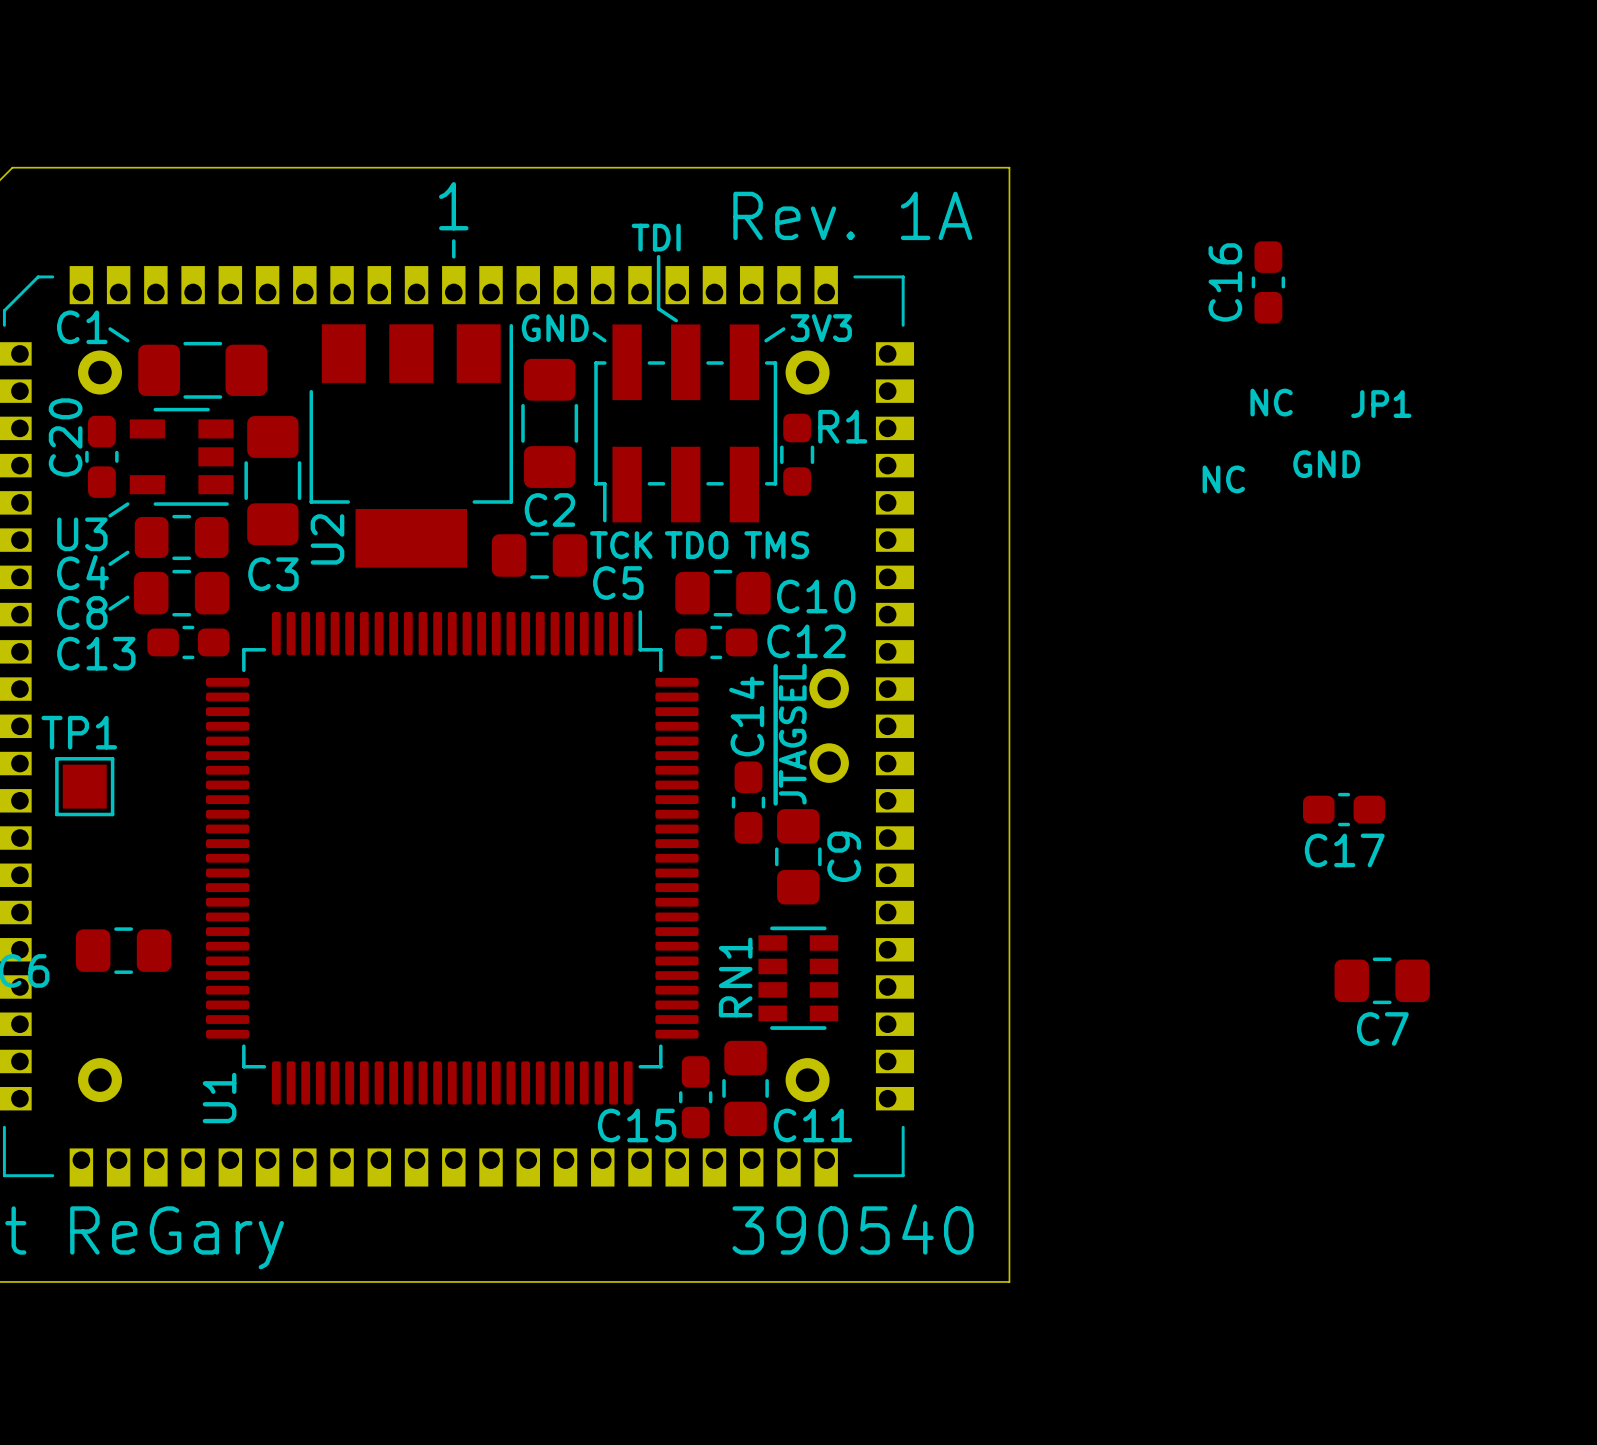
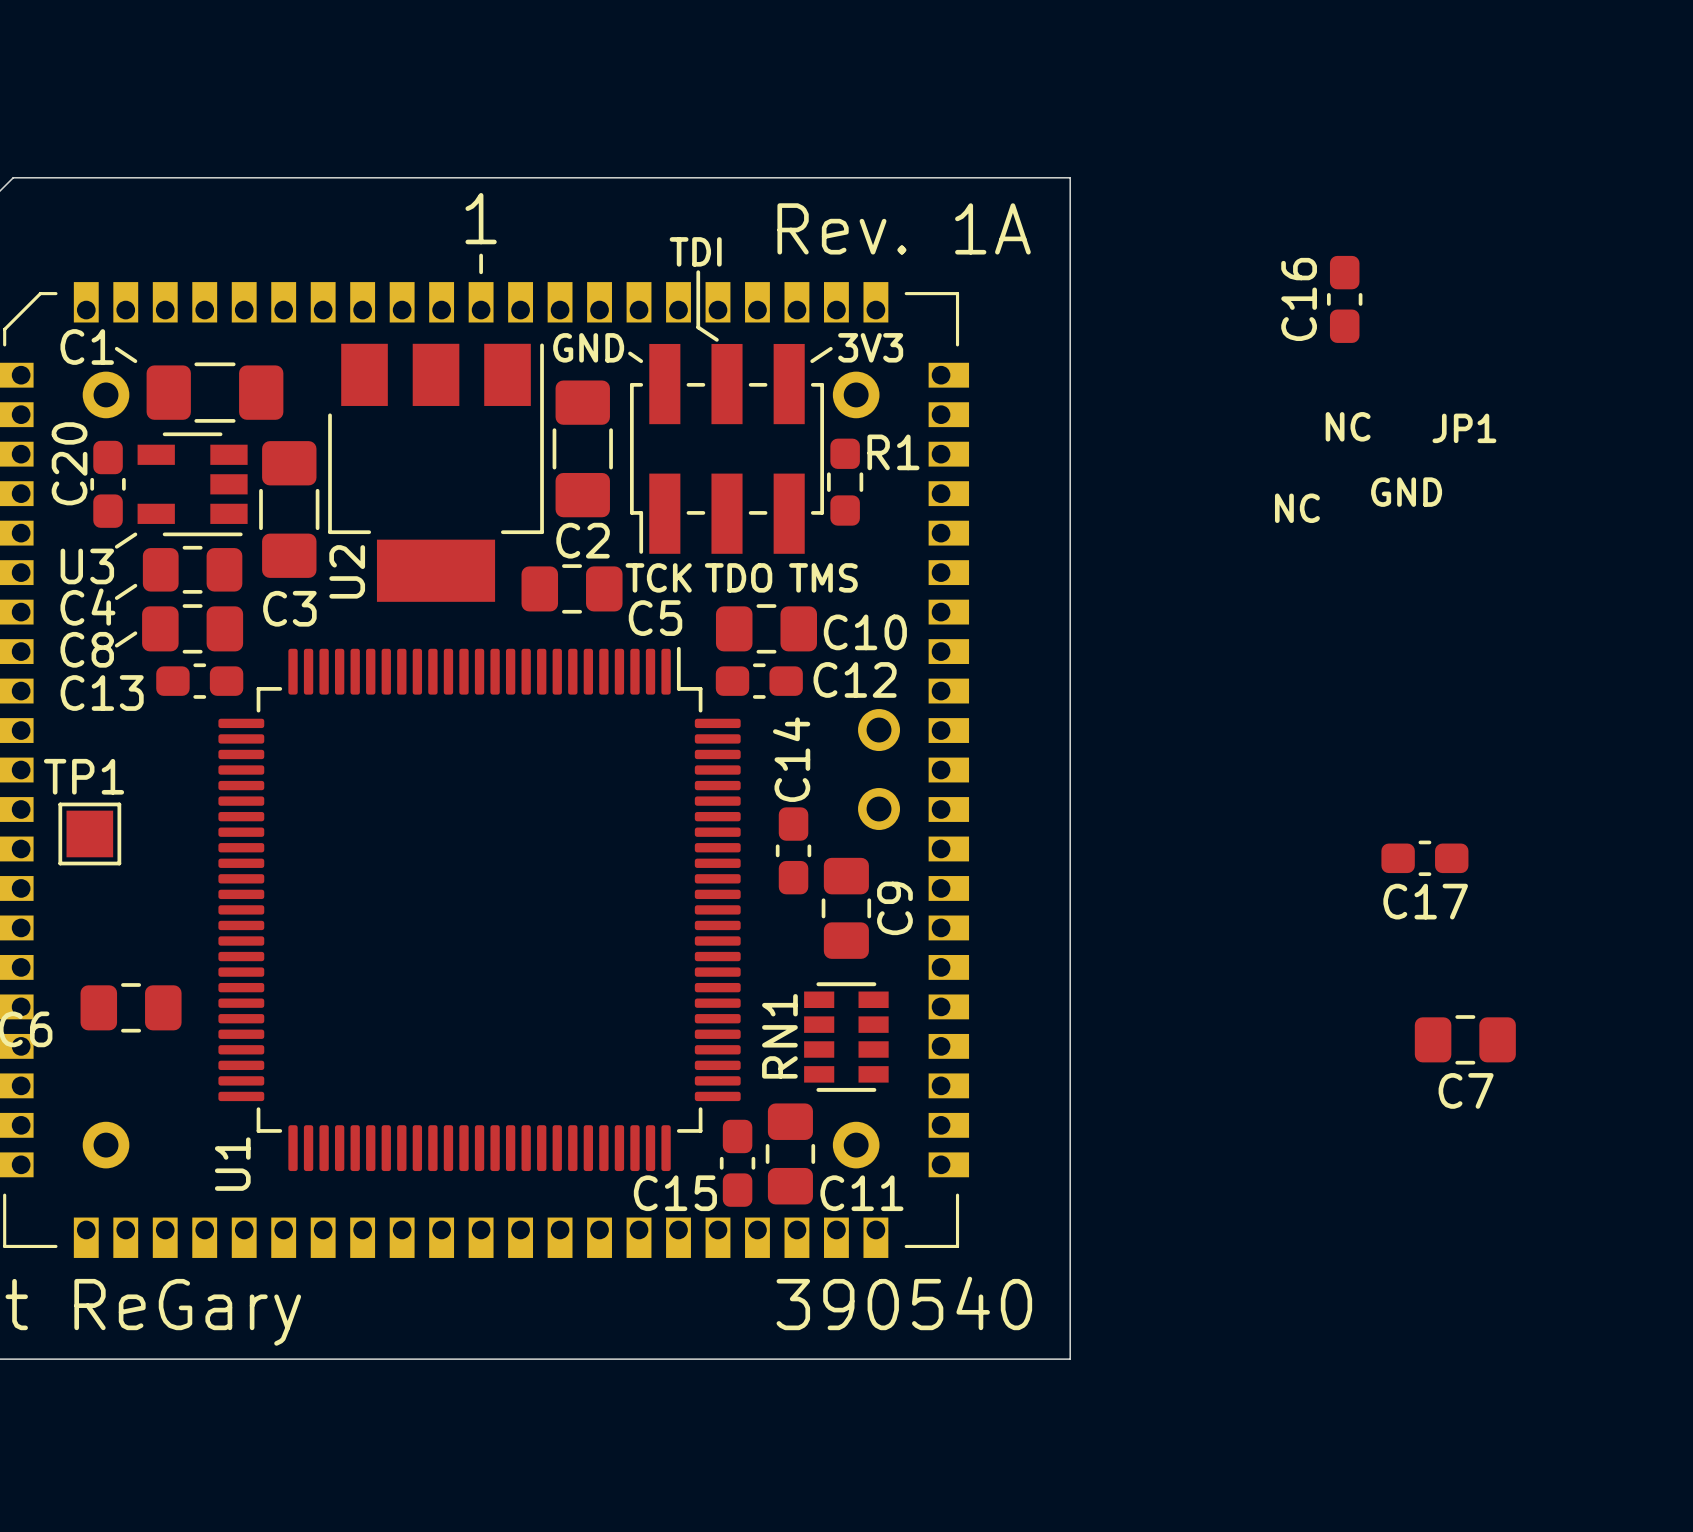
text: ~{JTAGSEL} (790, 734) -> none

